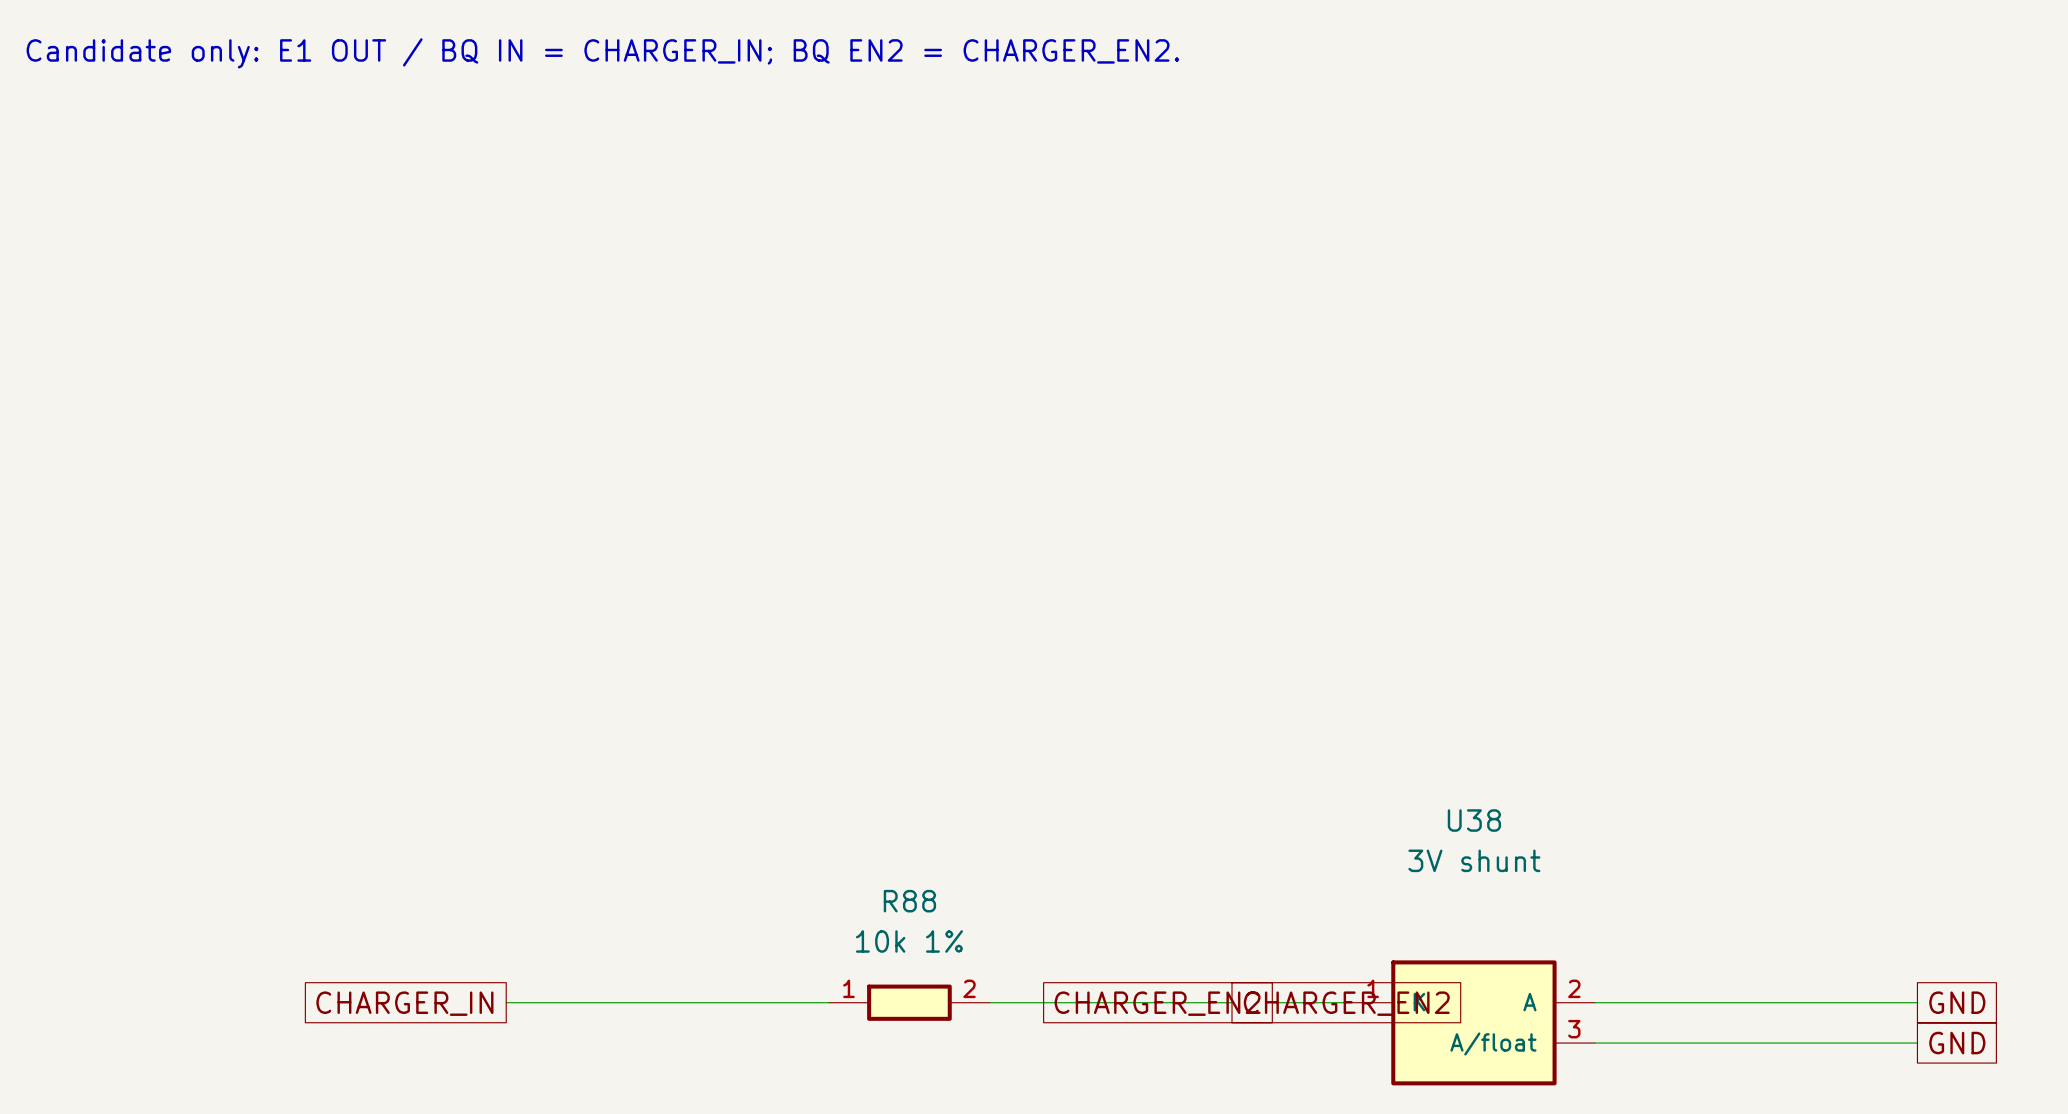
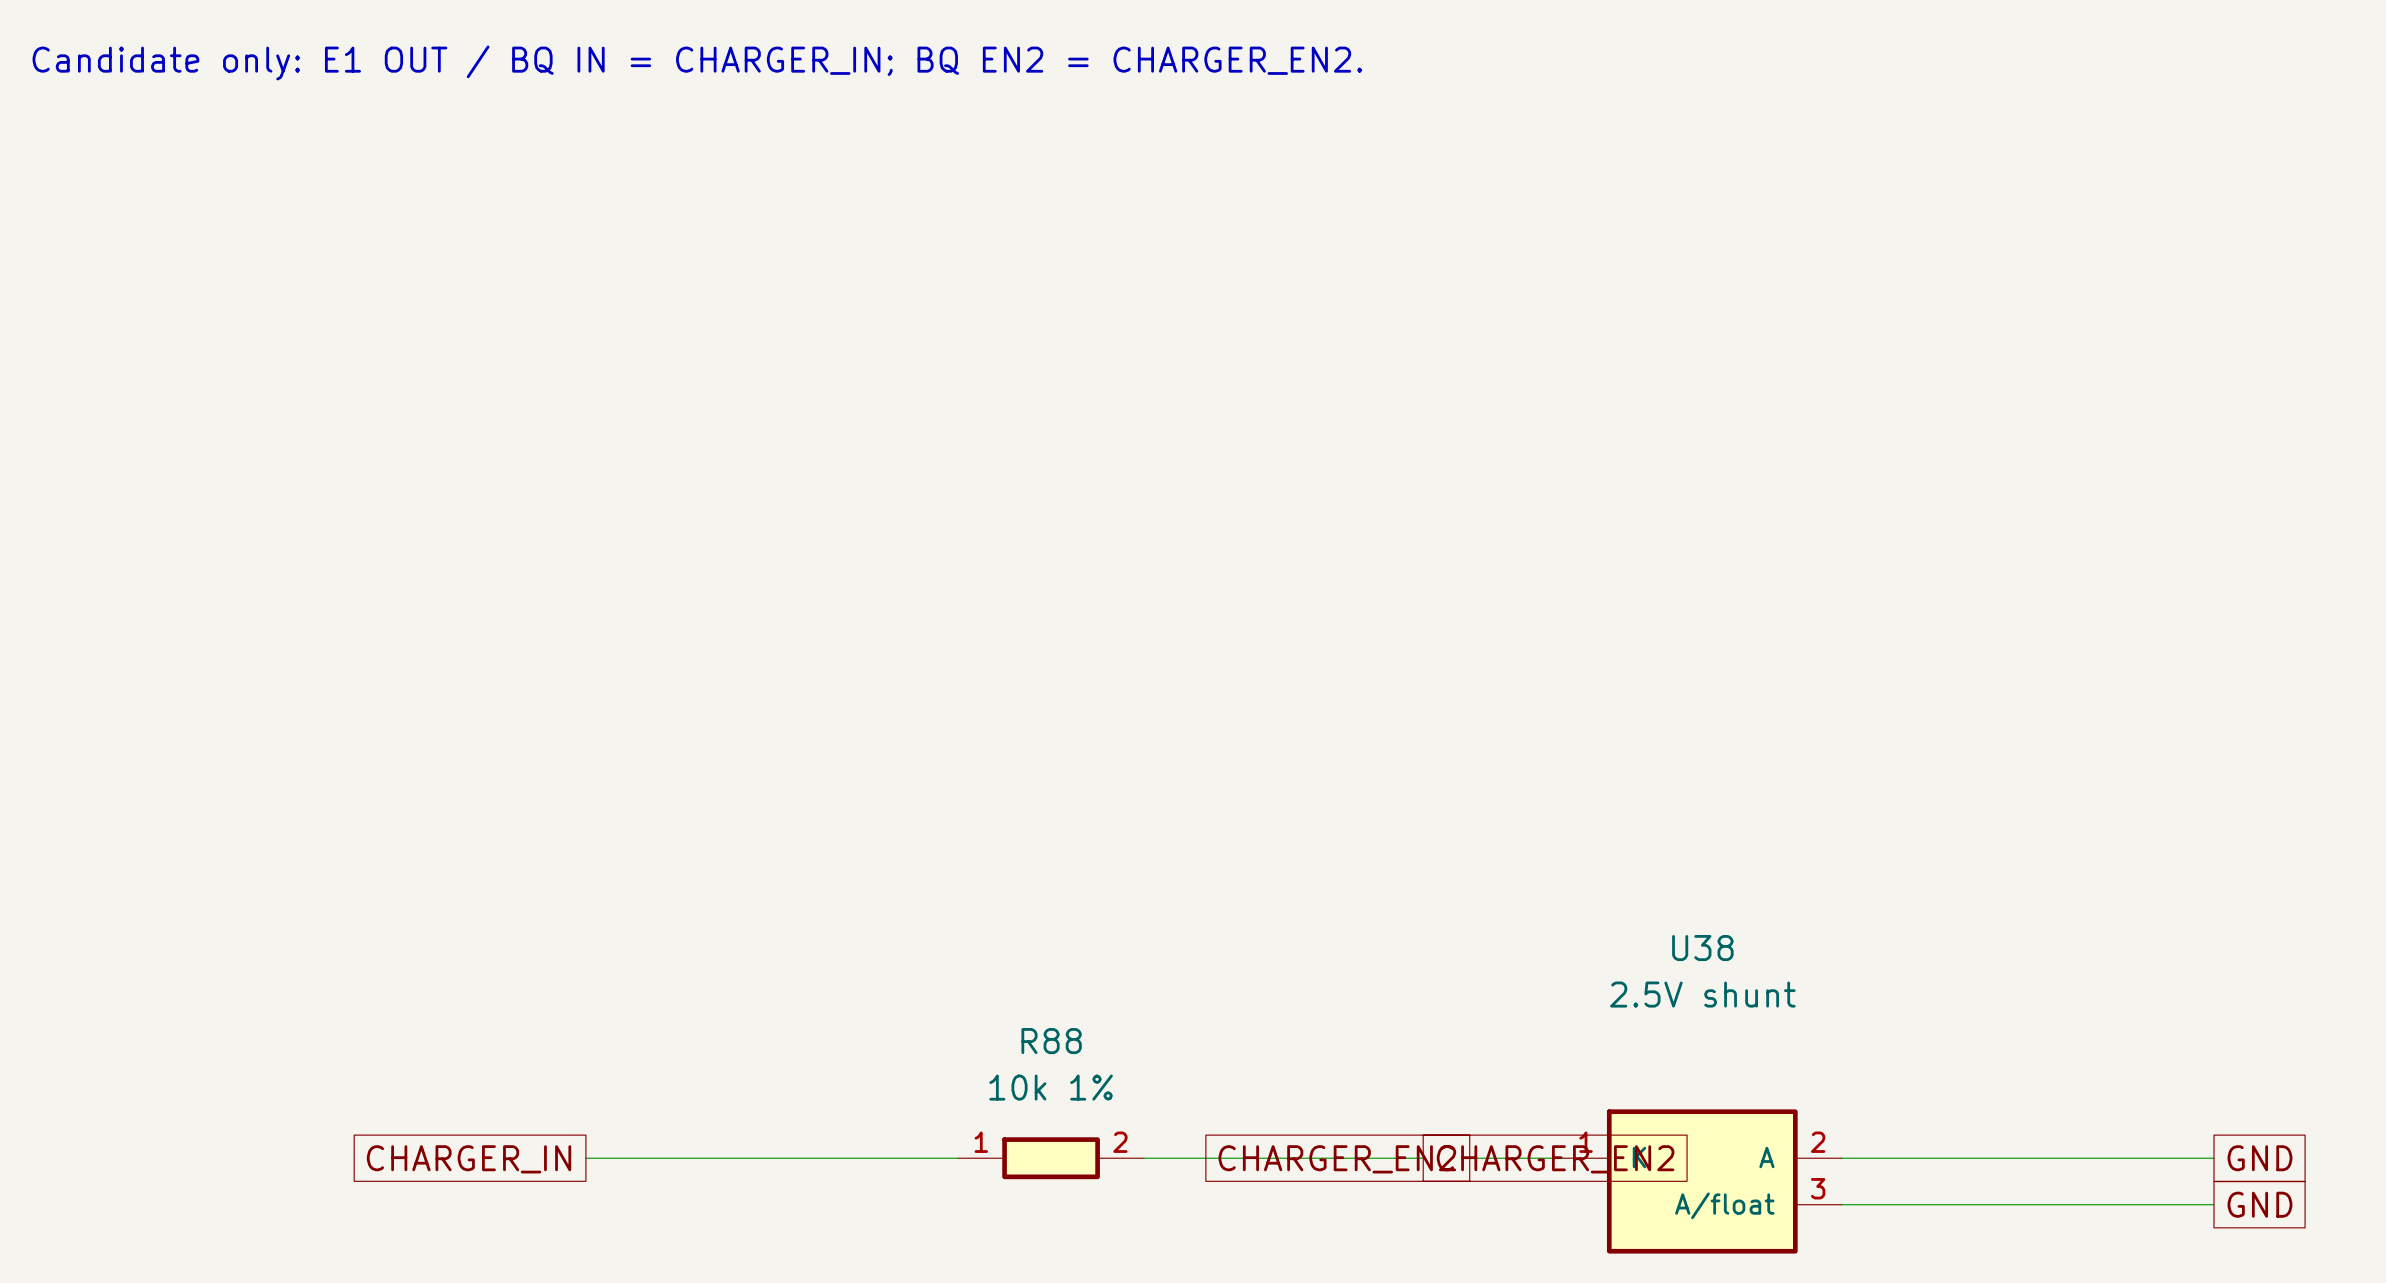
U38 value: 3V shunt (1474, 860) -> 2.5V shunt (1702, 994)

